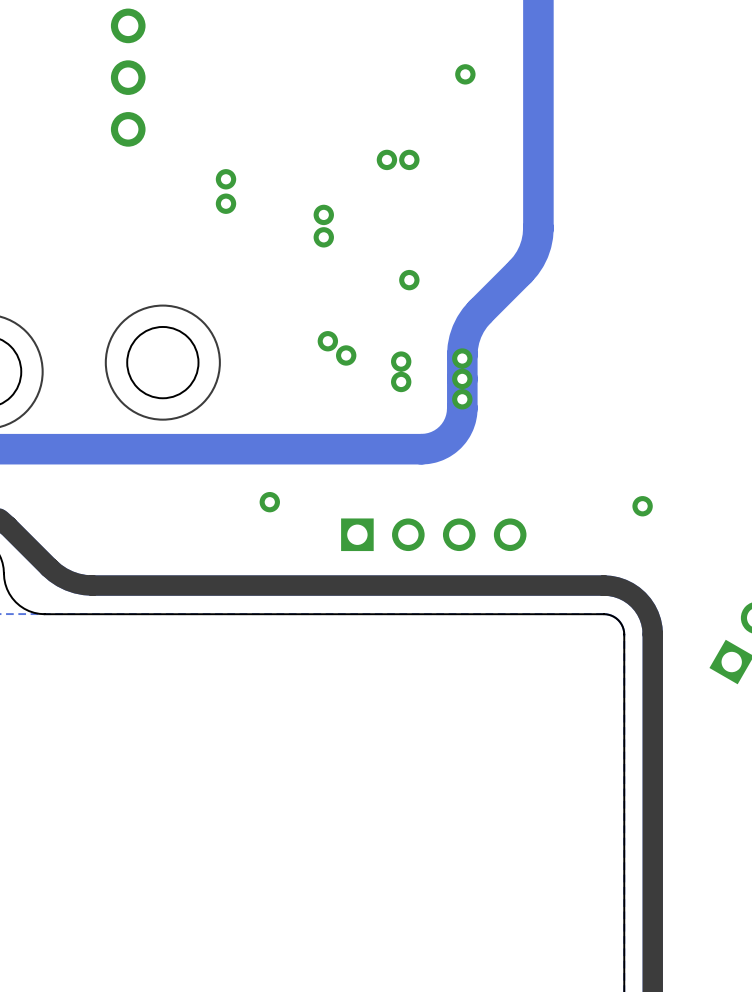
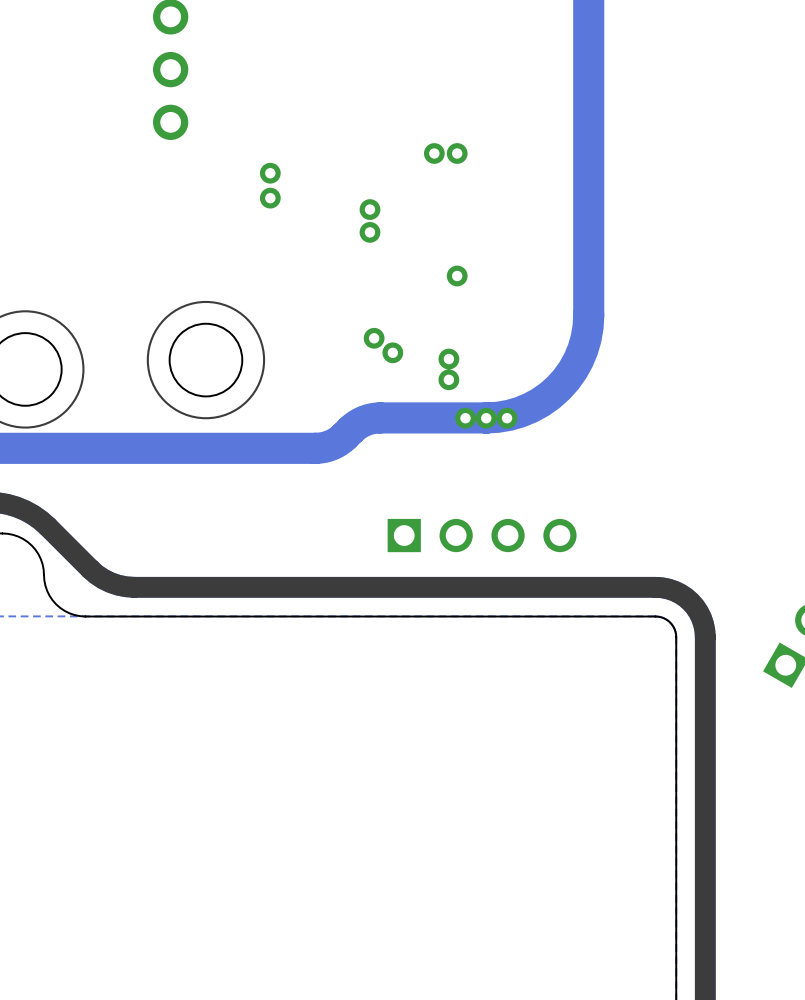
via: (465, 74) -> none
track: (538, 228) (533, 251) (525, 265) (480, 311) (466, 331) (462, 355) (461, 413) (456, 428) (446, 440) (432, 447) (421, 449) (270, 449) -> (588, 223) (588, 315) (586, 338) (573, 369) (550, 395) (530, 407) (497, 417) (372, 418) (357, 424) (334, 443) (315, 448)
via: (462, 358) -> none
via: (462, 378) -> none
via: (462, 399) -> none
via: none -> (465, 418)
via: none -> (486, 418)
via: none -> (507, 418)
via: (269, 502) -> none
via: (642, 506) -> none

